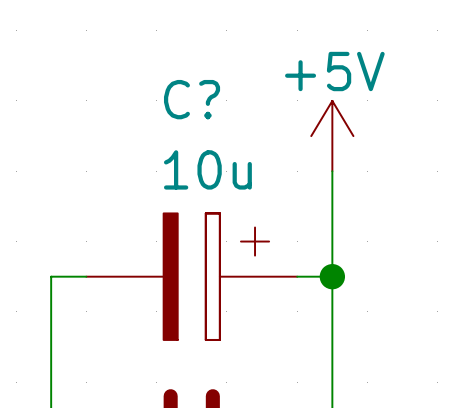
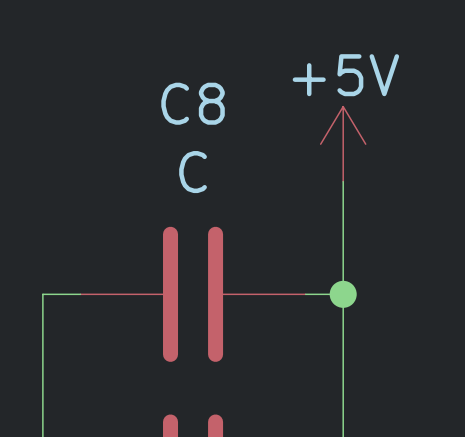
C?: 10u (191, 276) -> none
C8: none -> C (193, 294)

